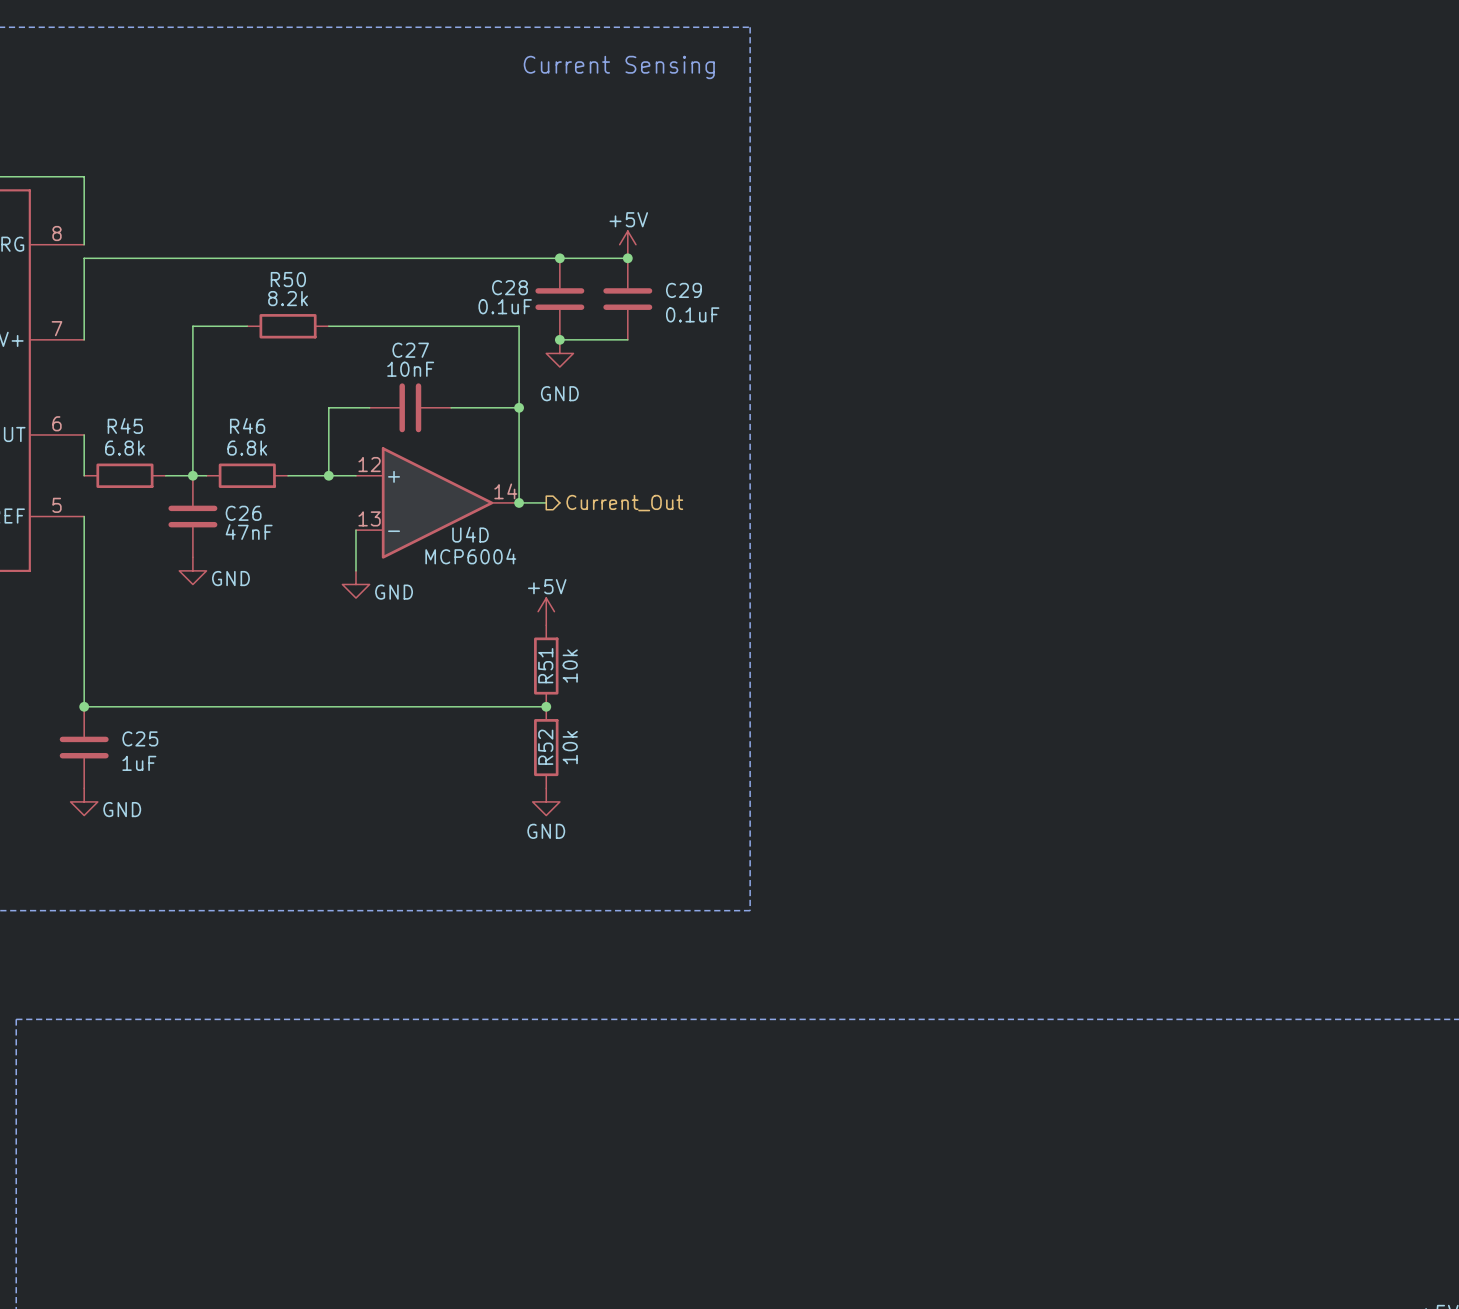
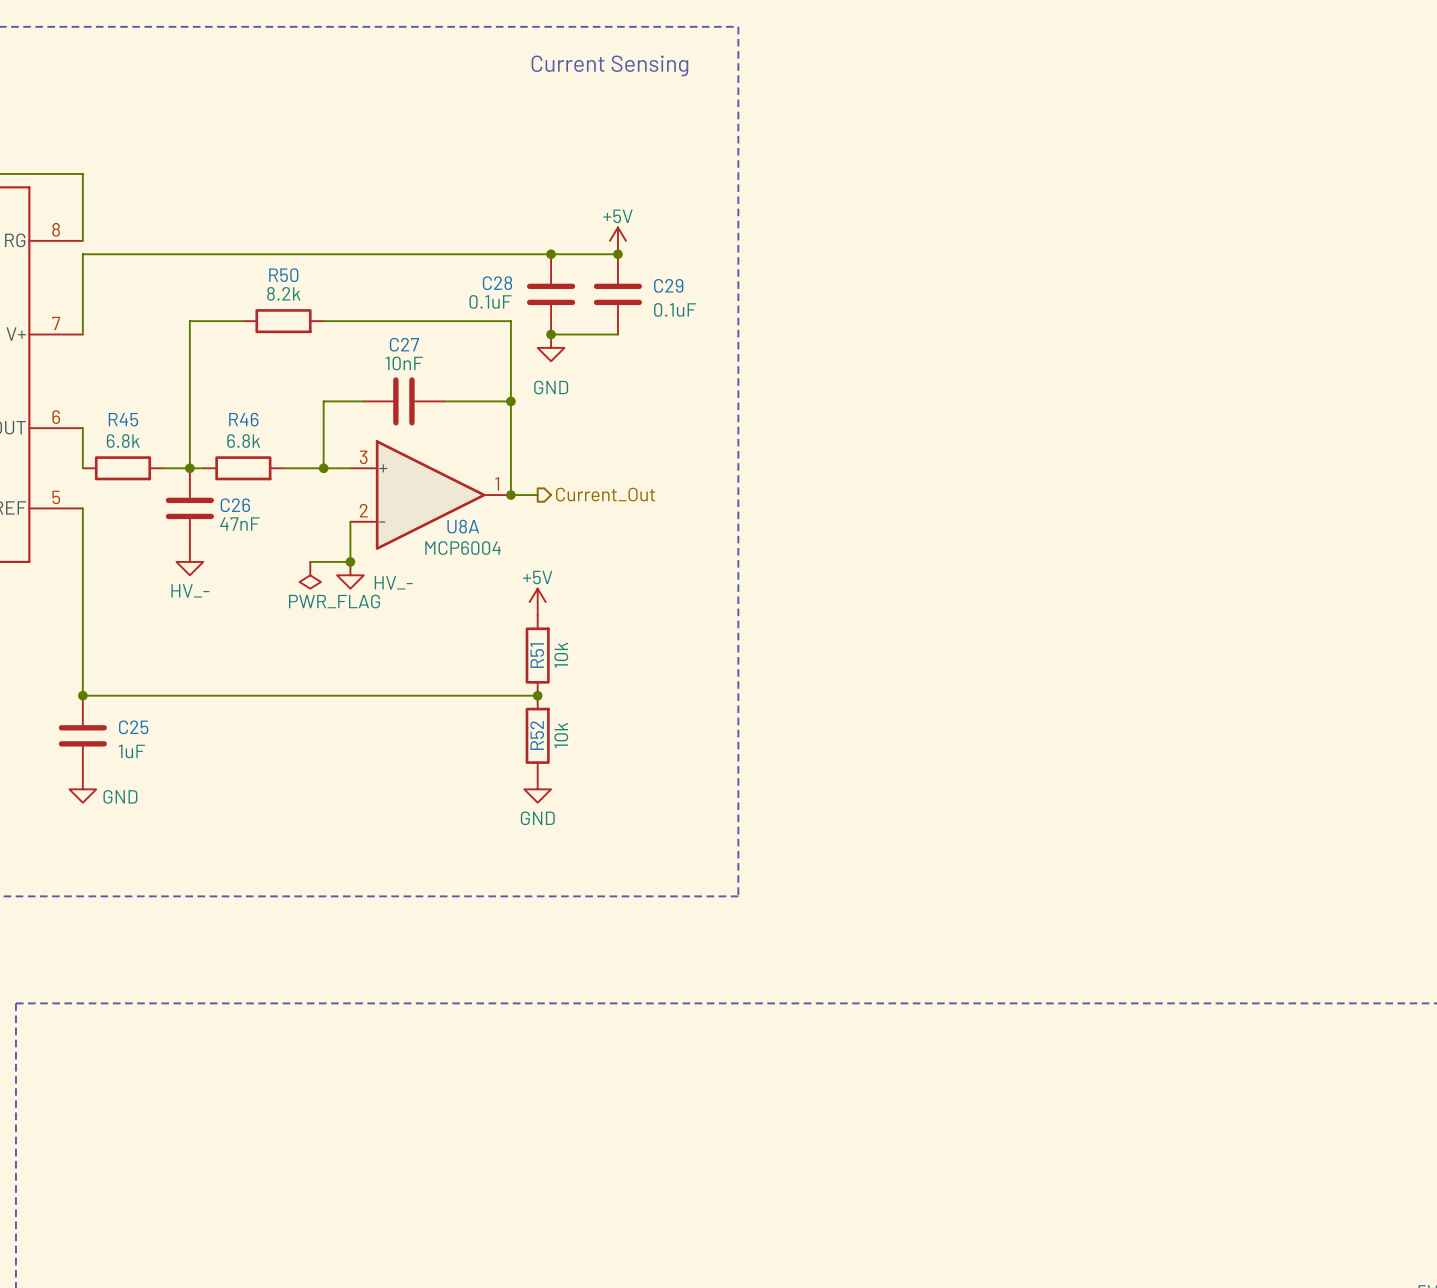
U4D pin number: 12 (369, 464) -> 3 (363, 457)
U4D pin number: 14 (505, 491) -> 1 (497, 484)
U4D pin number: 13 (369, 518) -> 2 (363, 510)
U4D name: U4D (470, 534) -> U8A (463, 526)
power symbol: GND (192, 570) -> HV_- (189, 561)
wire: none -> (310, 561) (350, 561)
junction: none -> (350, 561)
power symbol: none -> PWR_FLAG (310, 575)
power symbol: GND (356, 584) -> HV_- (350, 575)

